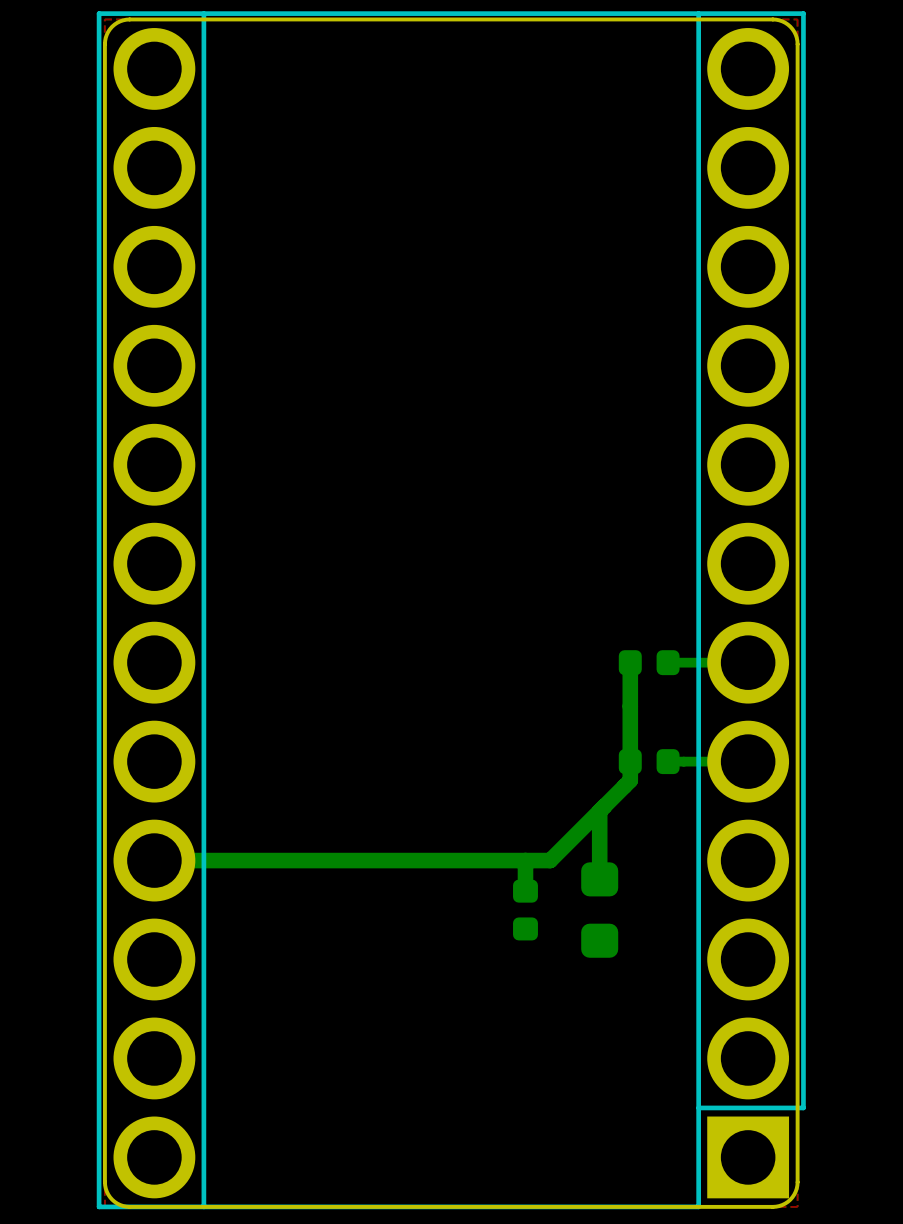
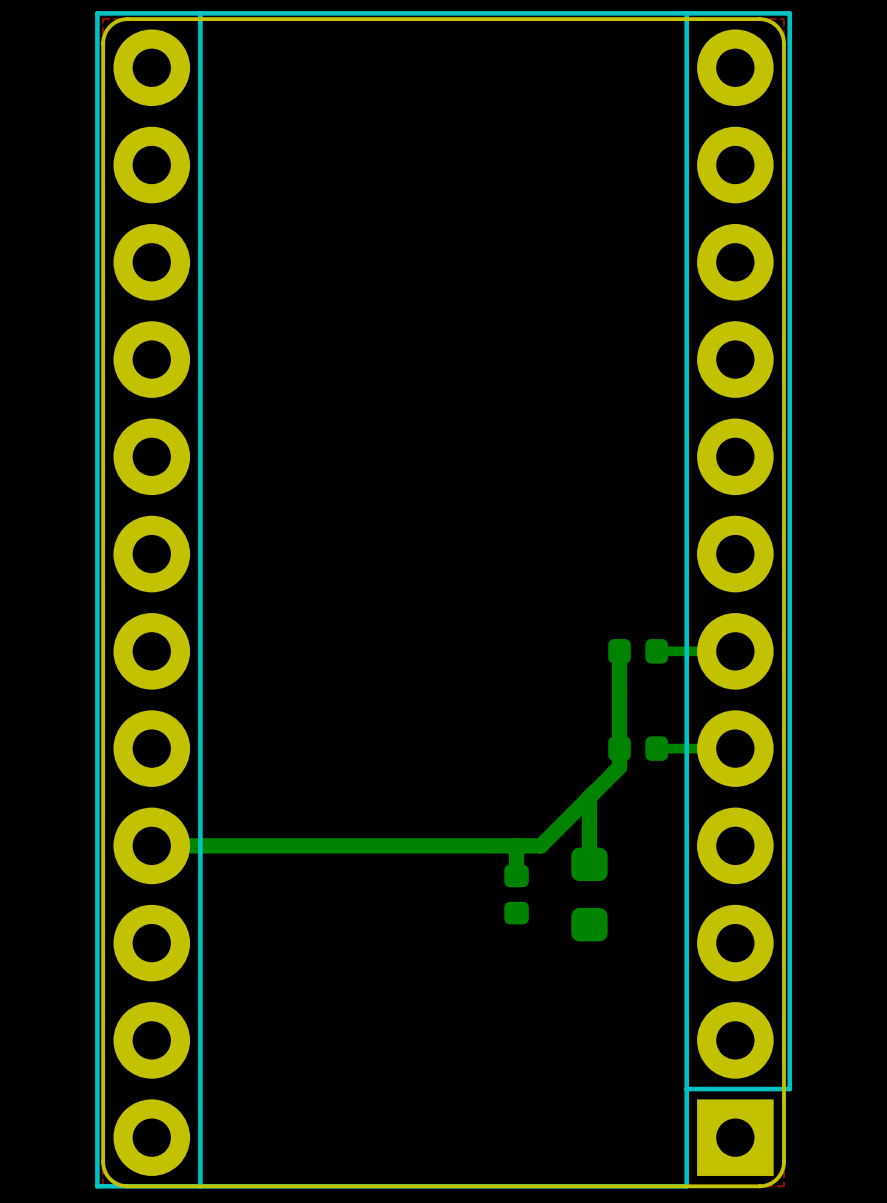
part footprint: [96, 11, 806, 1210] -> [95, 11, 793, 1189]

